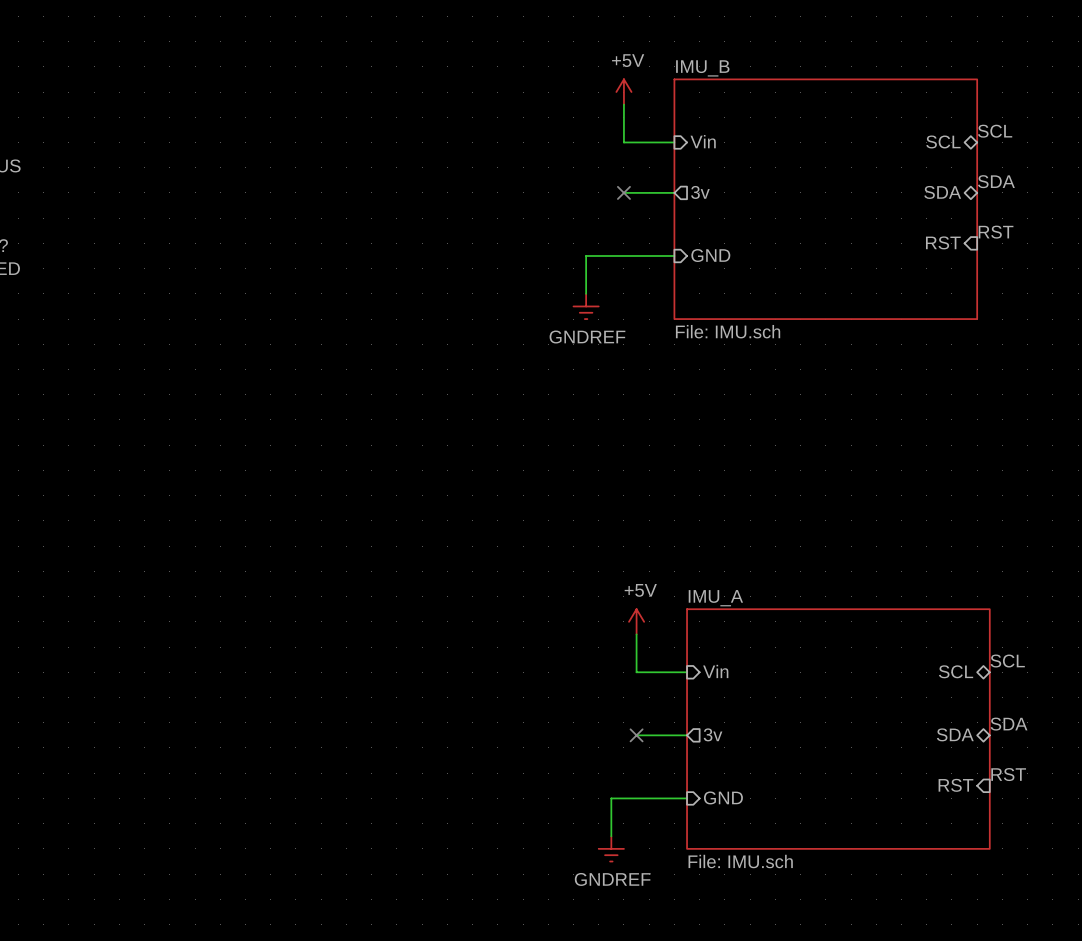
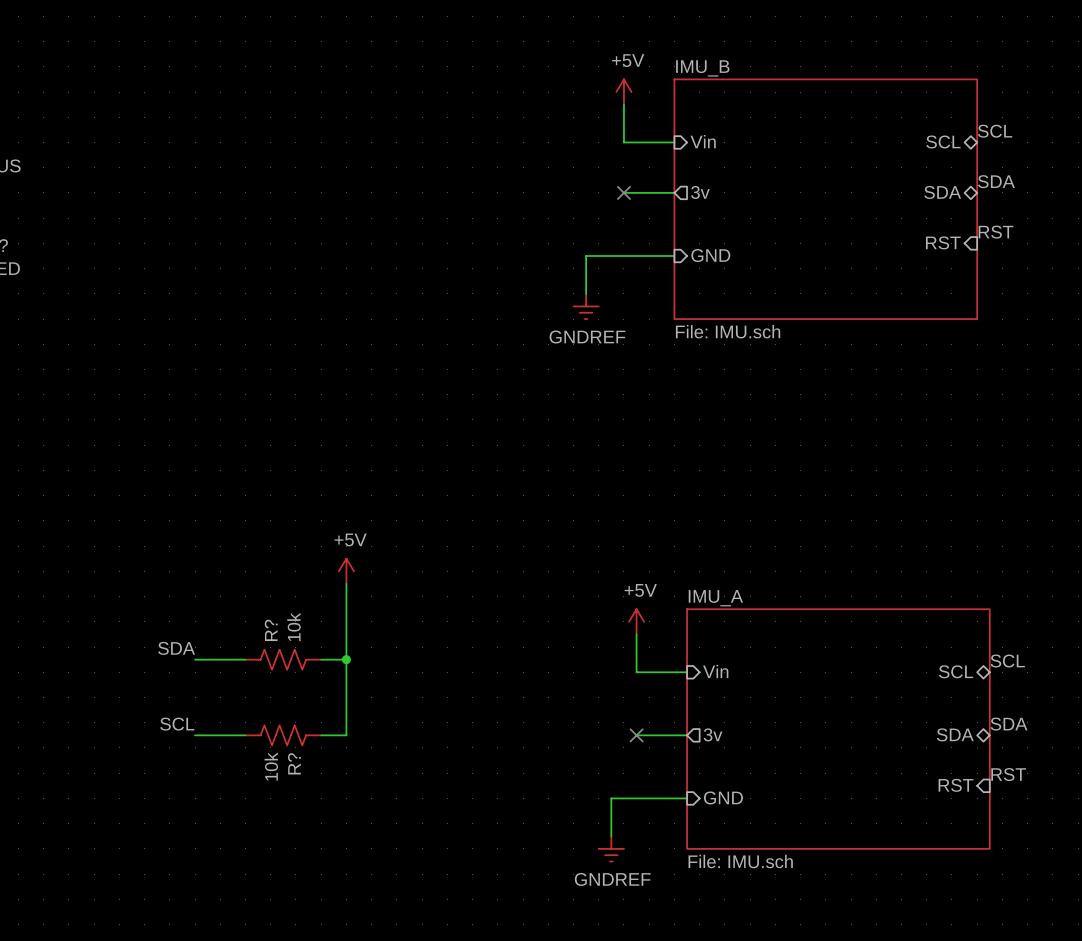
power symbol: none -> +5V (346, 571)
wire: none -> (346, 583) (346, 735) (321, 735)
label: none -> SDA (176, 648)
wire: none -> (195, 659) (245, 659)
R?: none -> 10k (283, 659)
wire: none -> (321, 659) (346, 659)
junction: none -> (346, 659)
label: none -> SCL (177, 724)
wire: none -> (195, 735) (245, 735)
R?: none -> 10k (283, 735)

